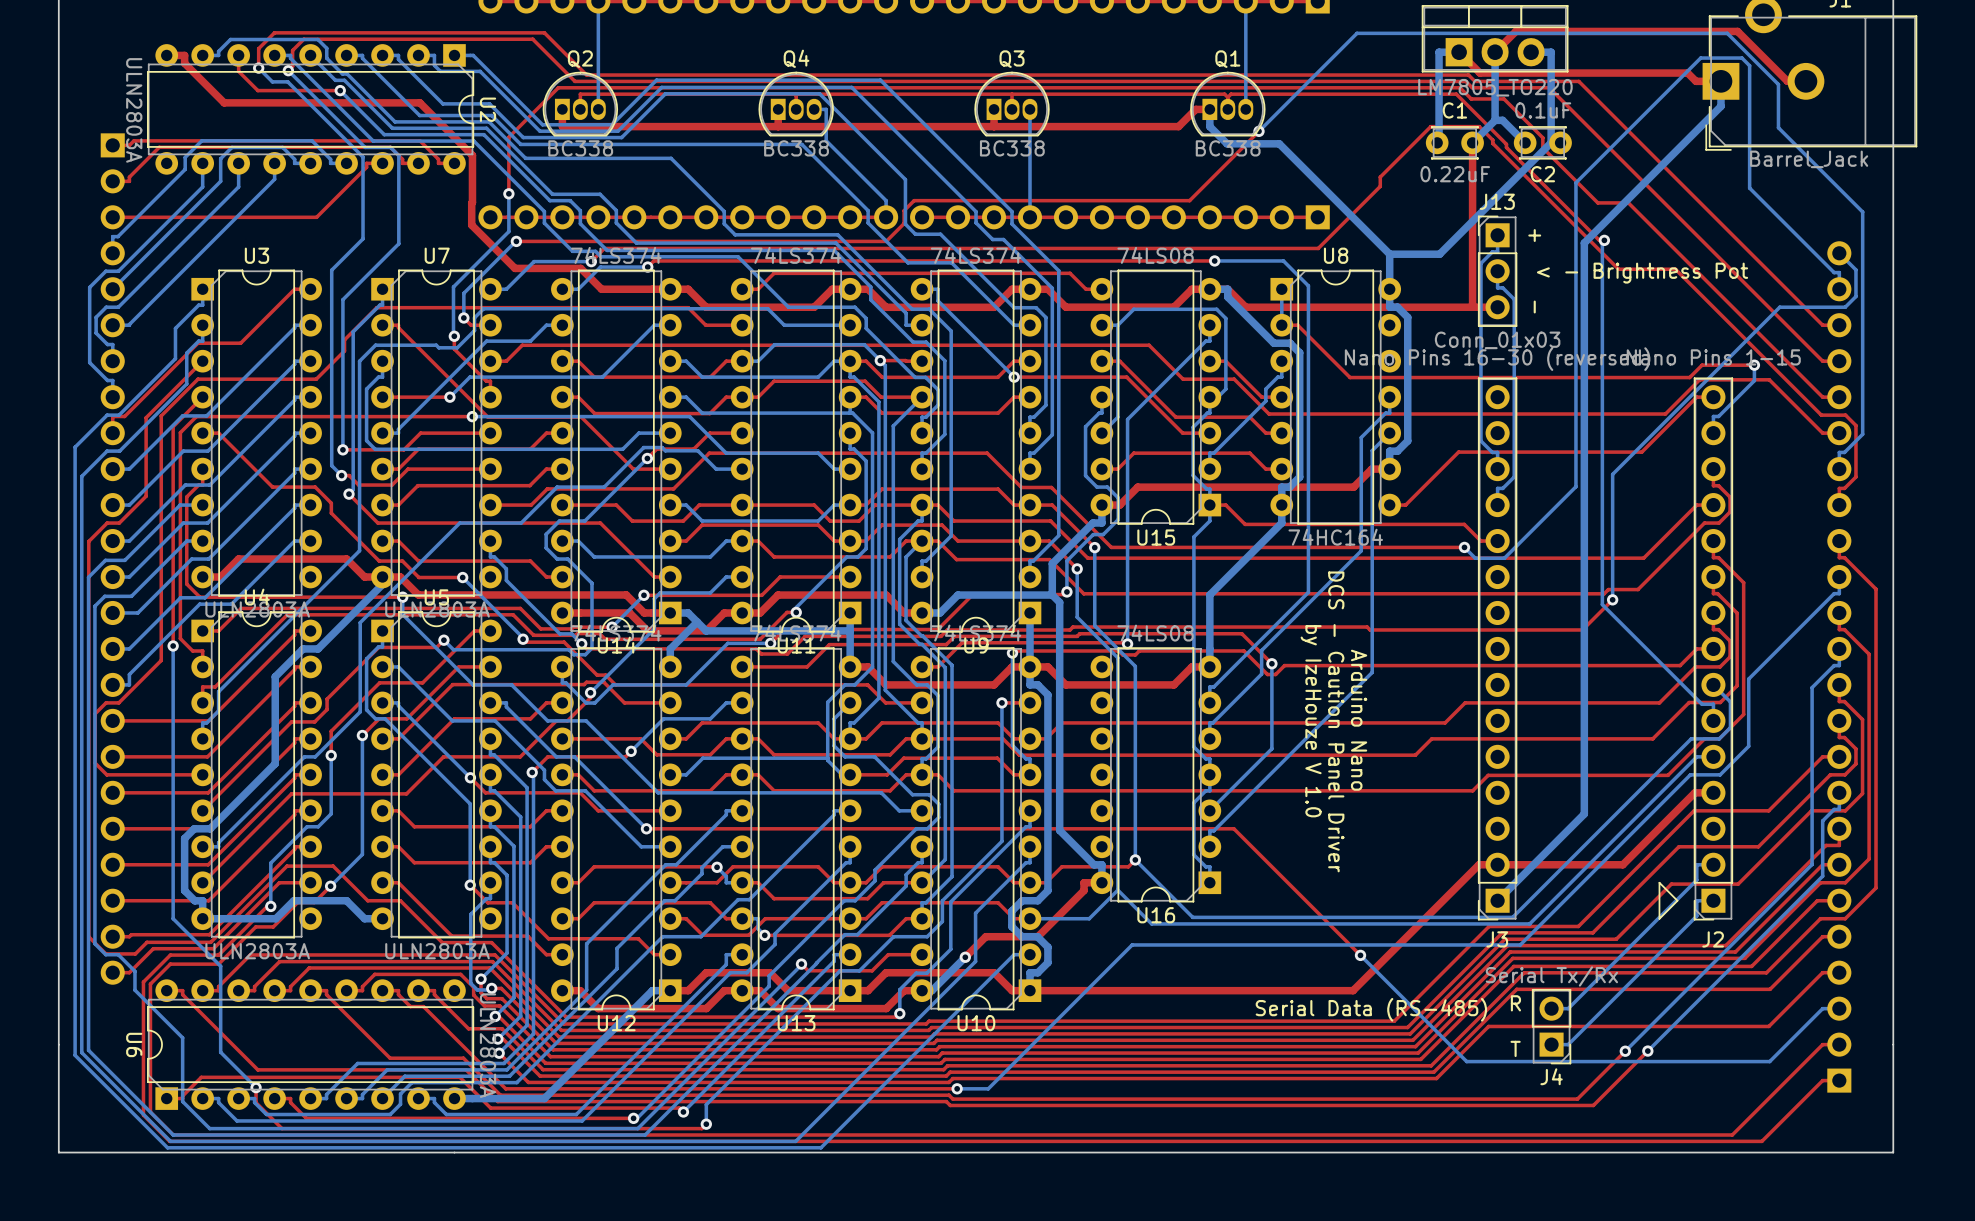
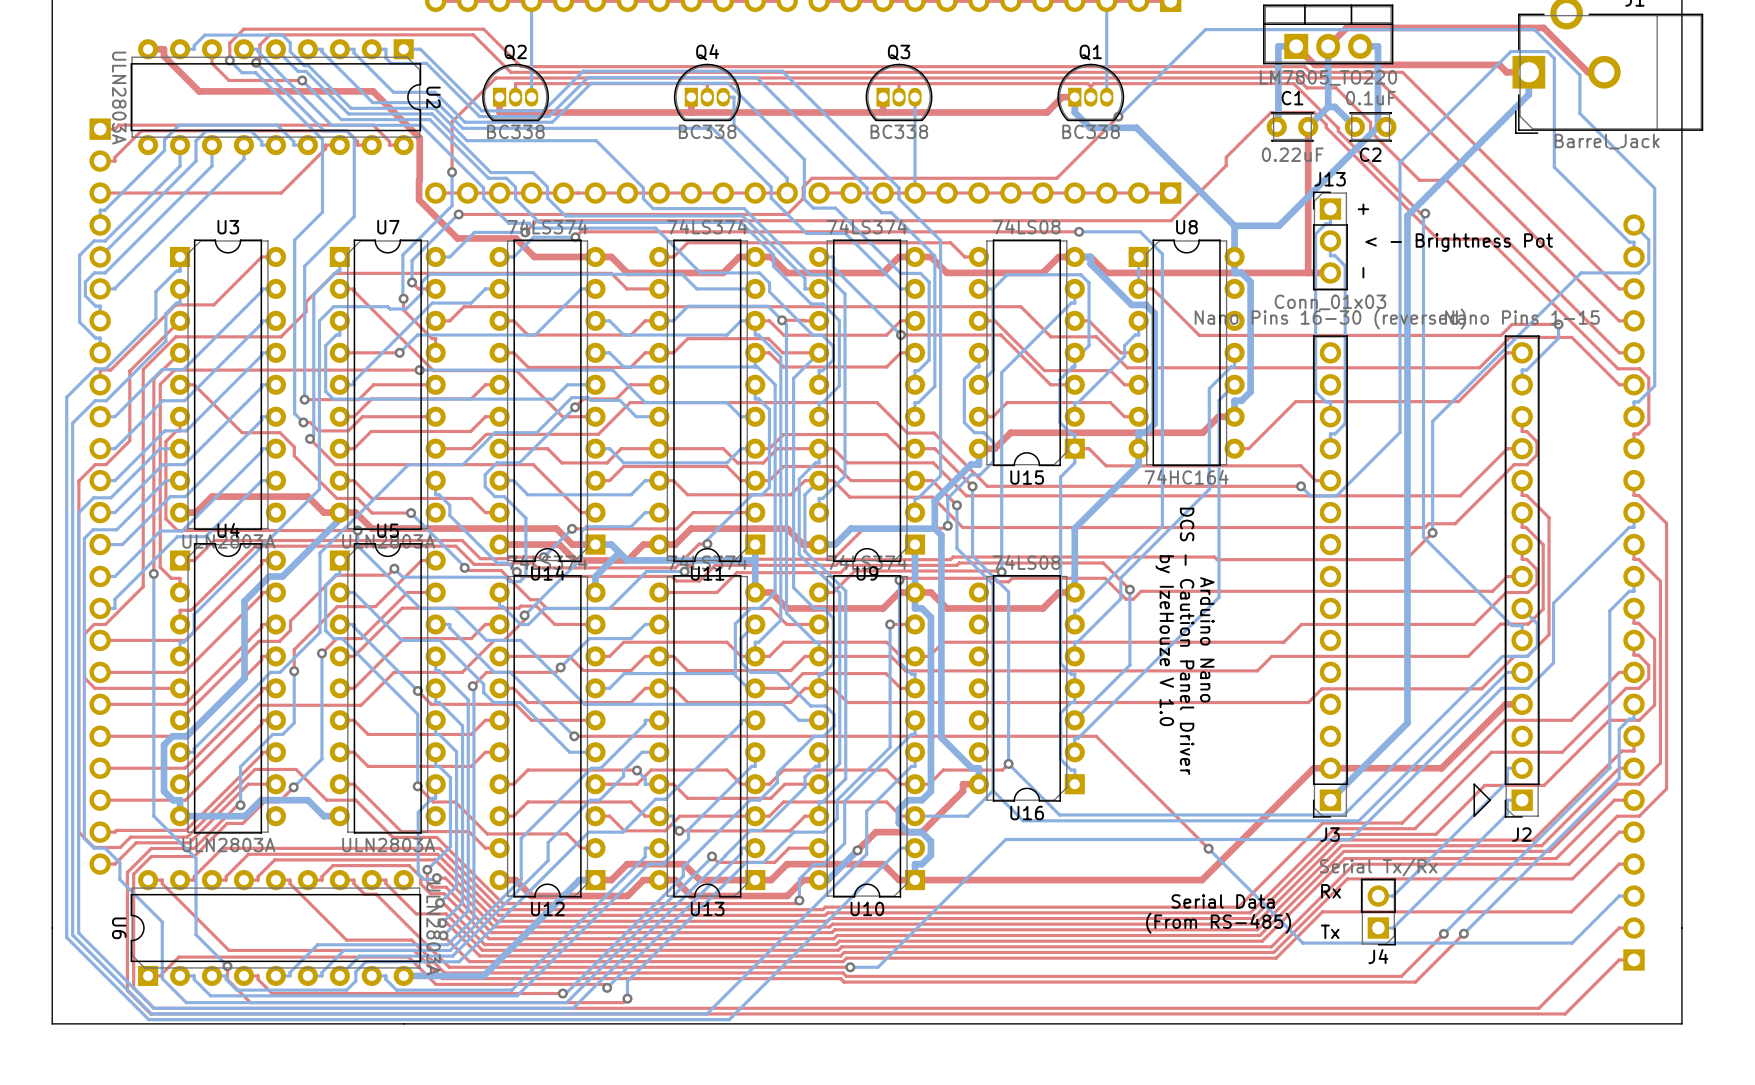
text: R (1515, 1003) -> Rx (1331, 891)
text: Serial Data (RS-485) (1371, 1009) -> Serial Data (1223, 901)
text: none -> (From RS-485) (1218, 923)
text: T (1515, 1048) -> Tx (1330, 931)

